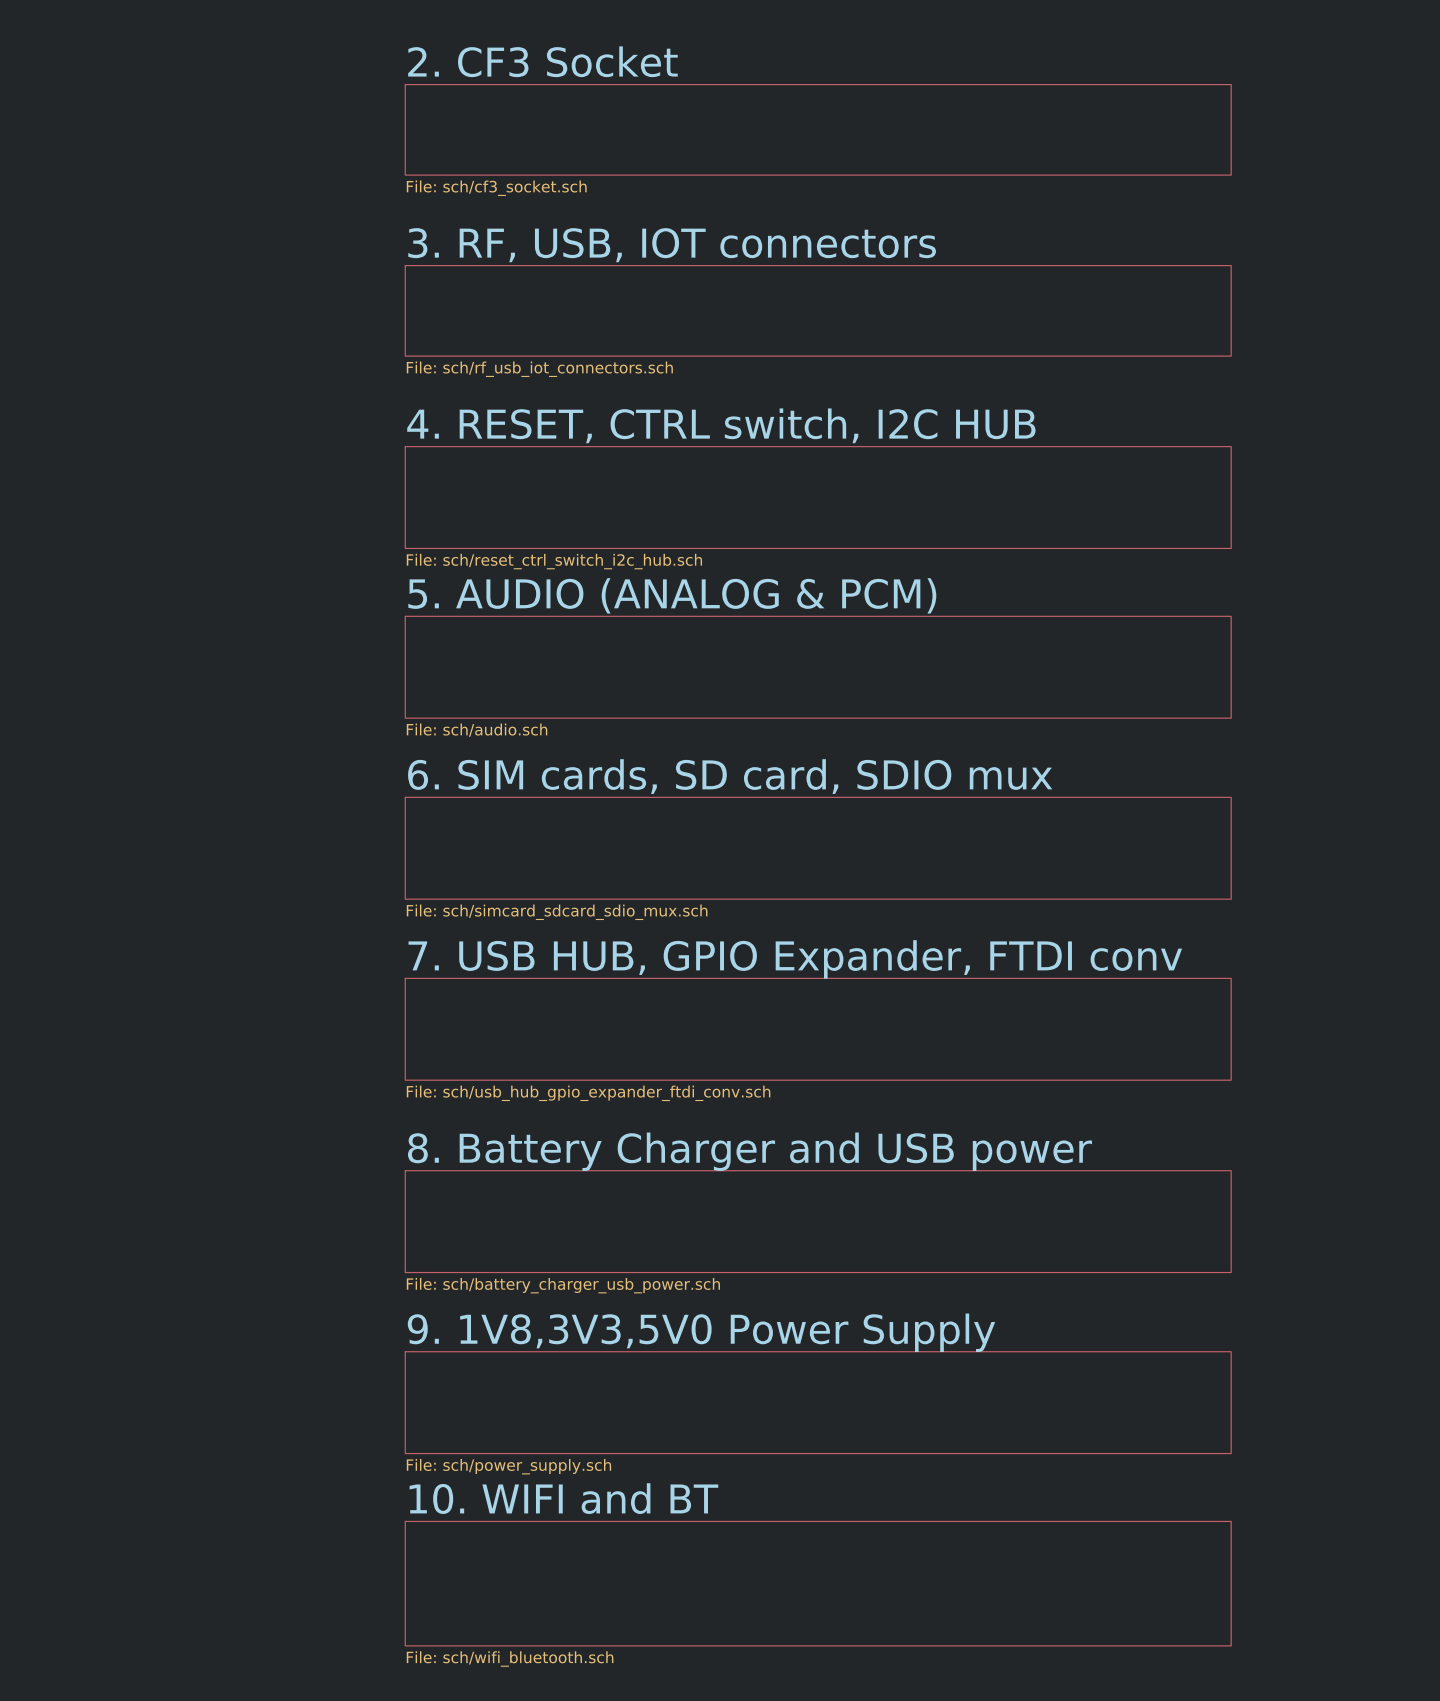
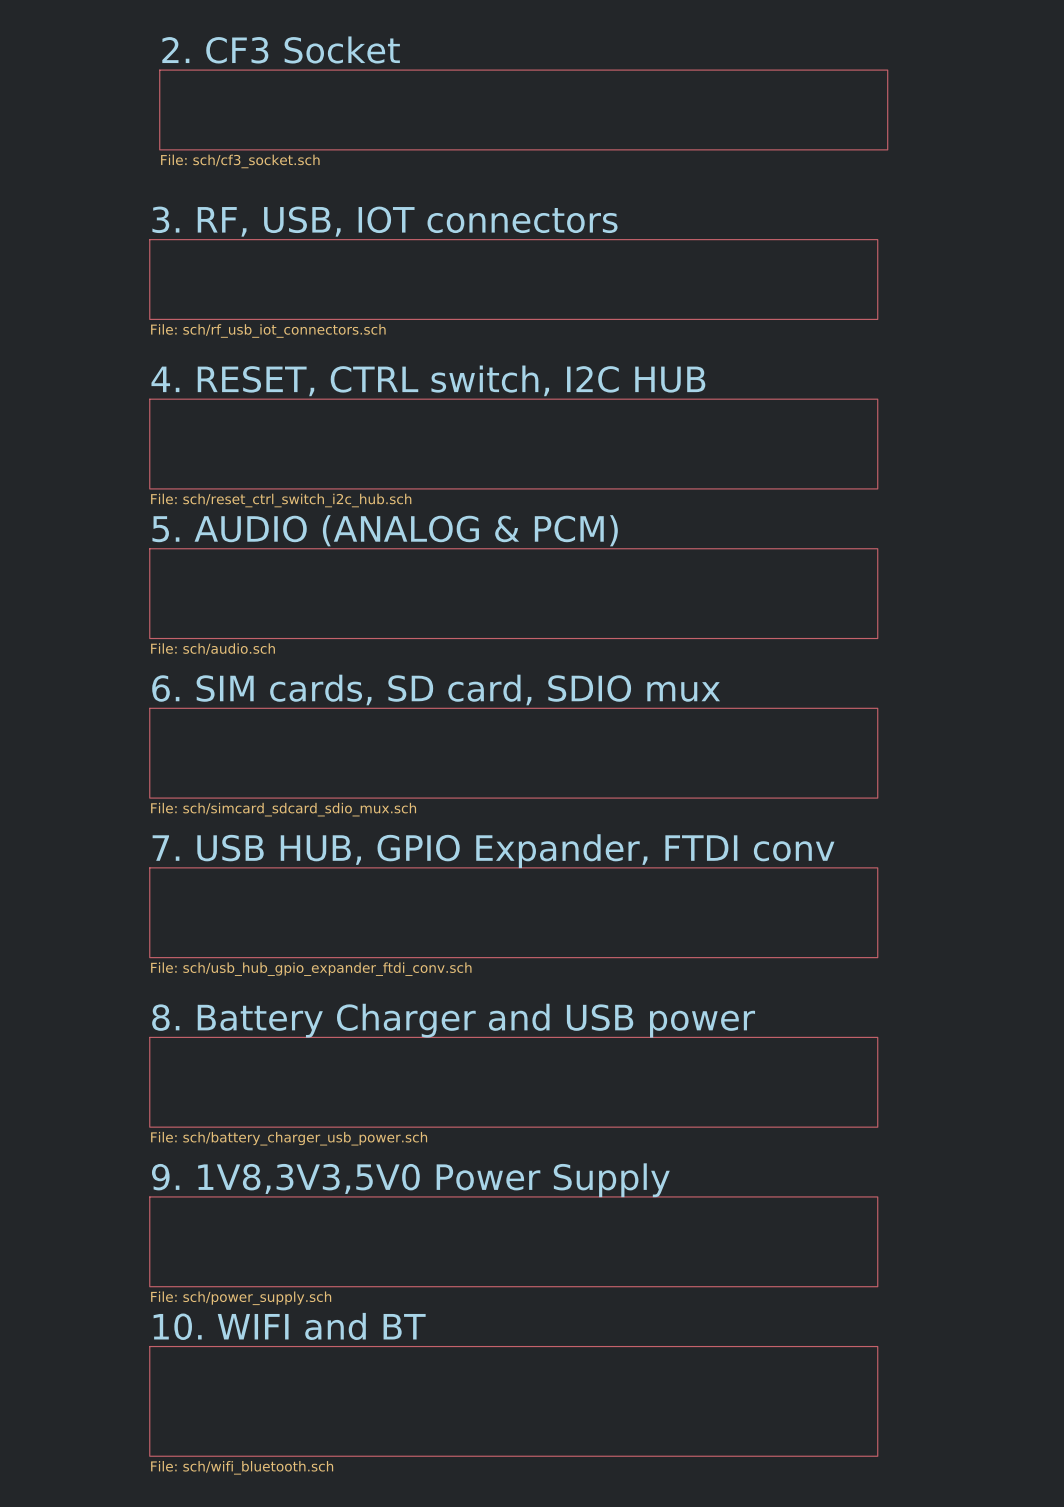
sheet 2. CF3 Socket position: (818, 129) -> (523, 109)

